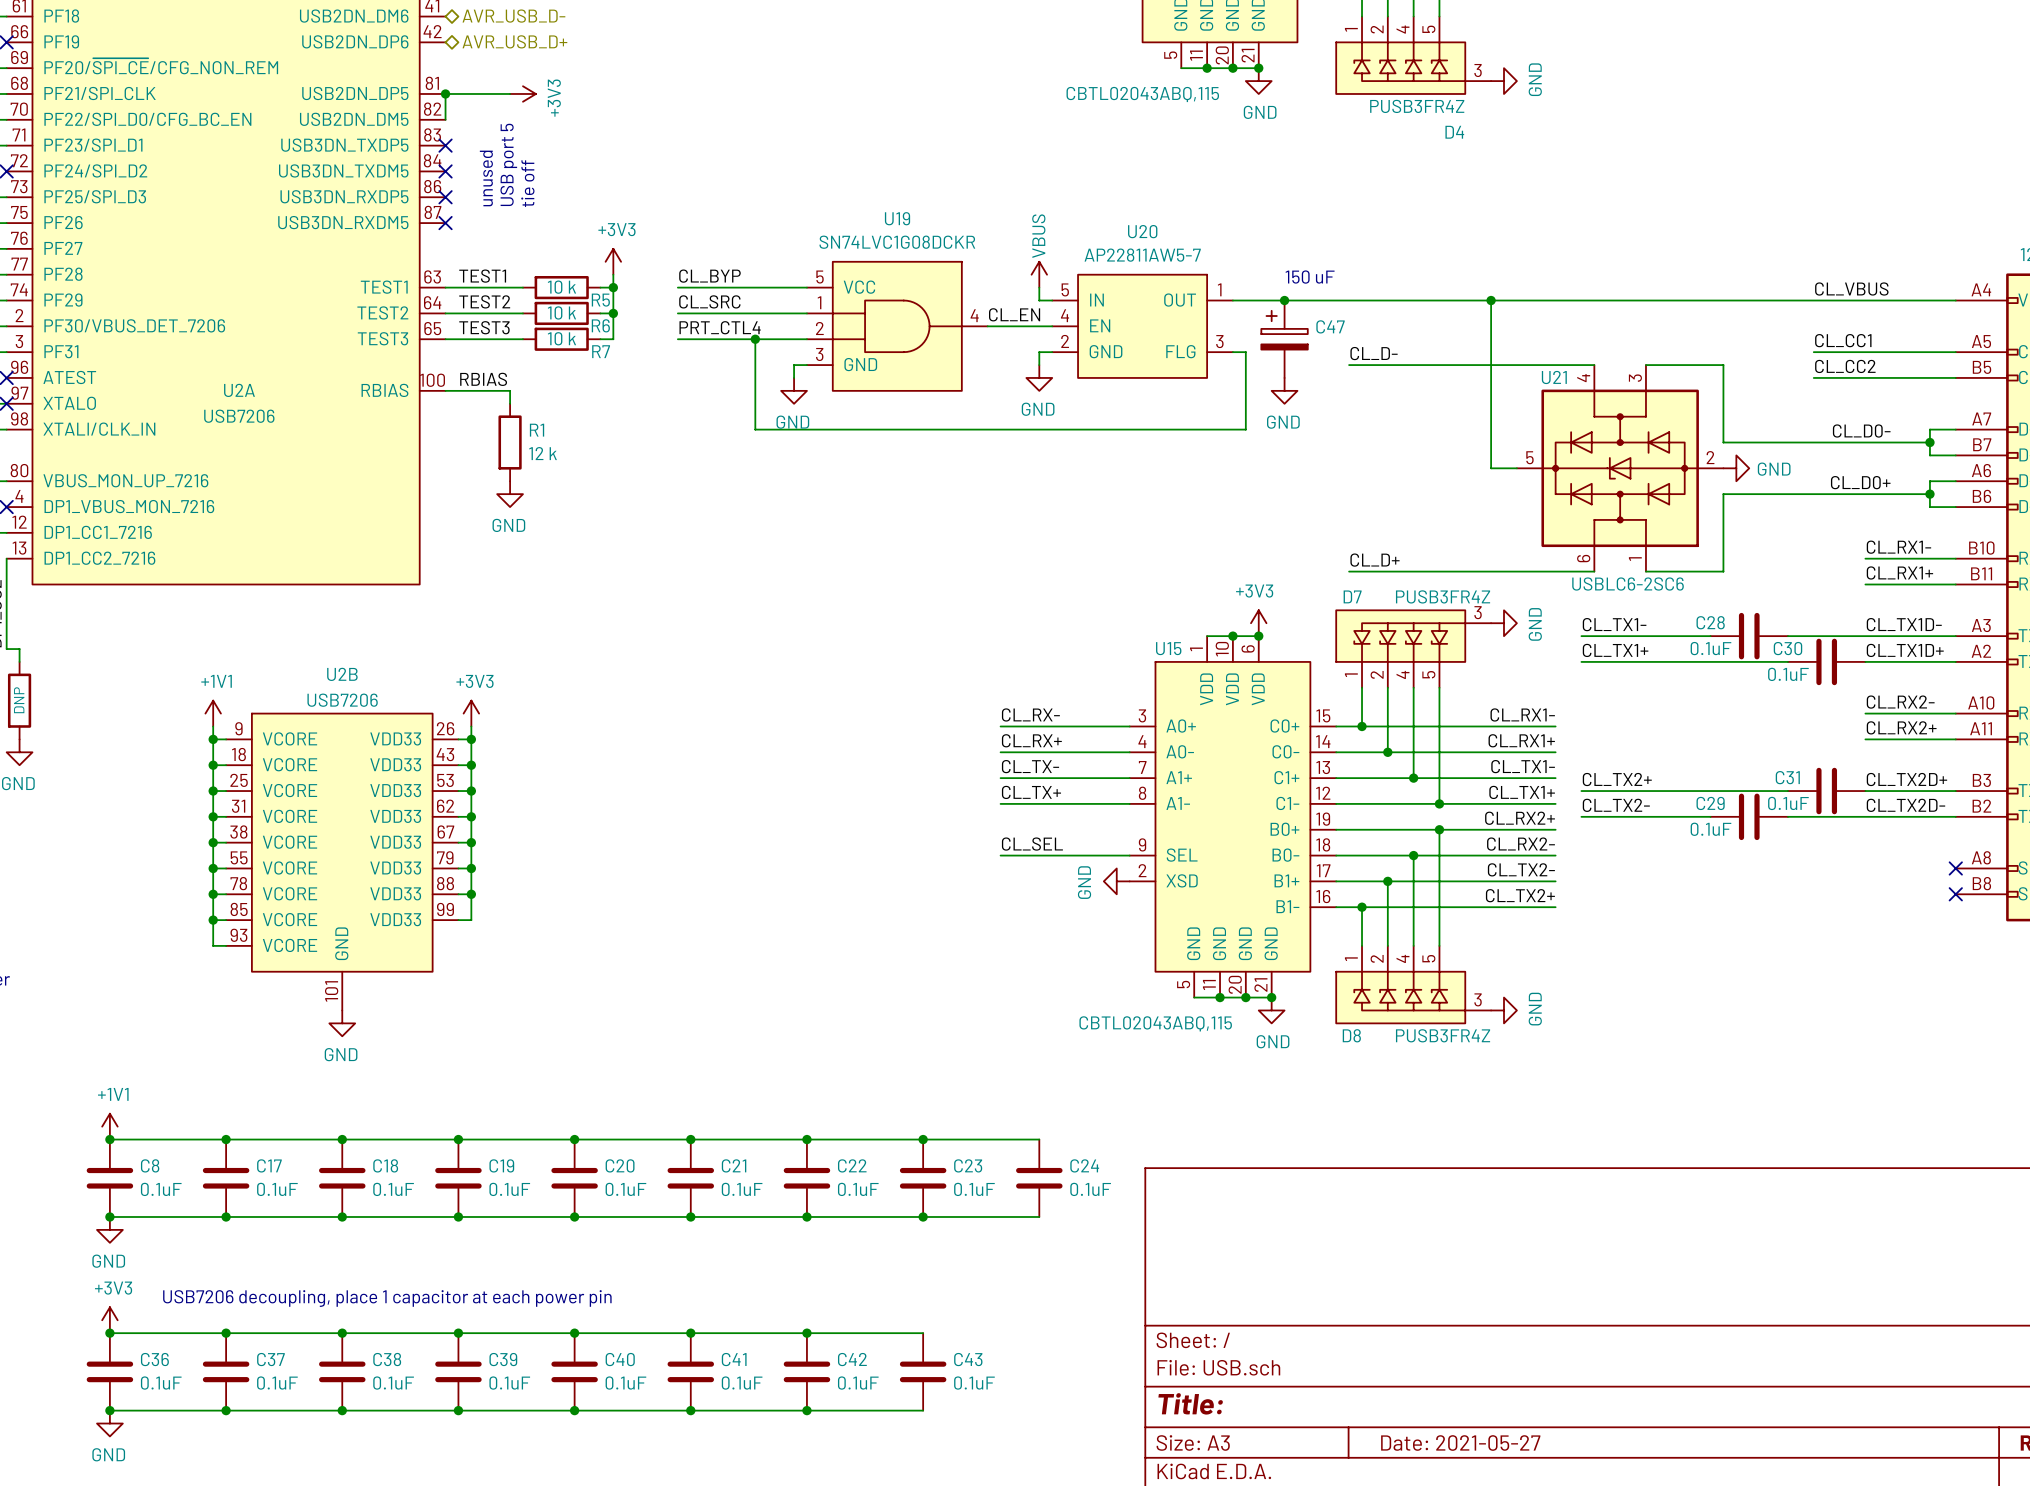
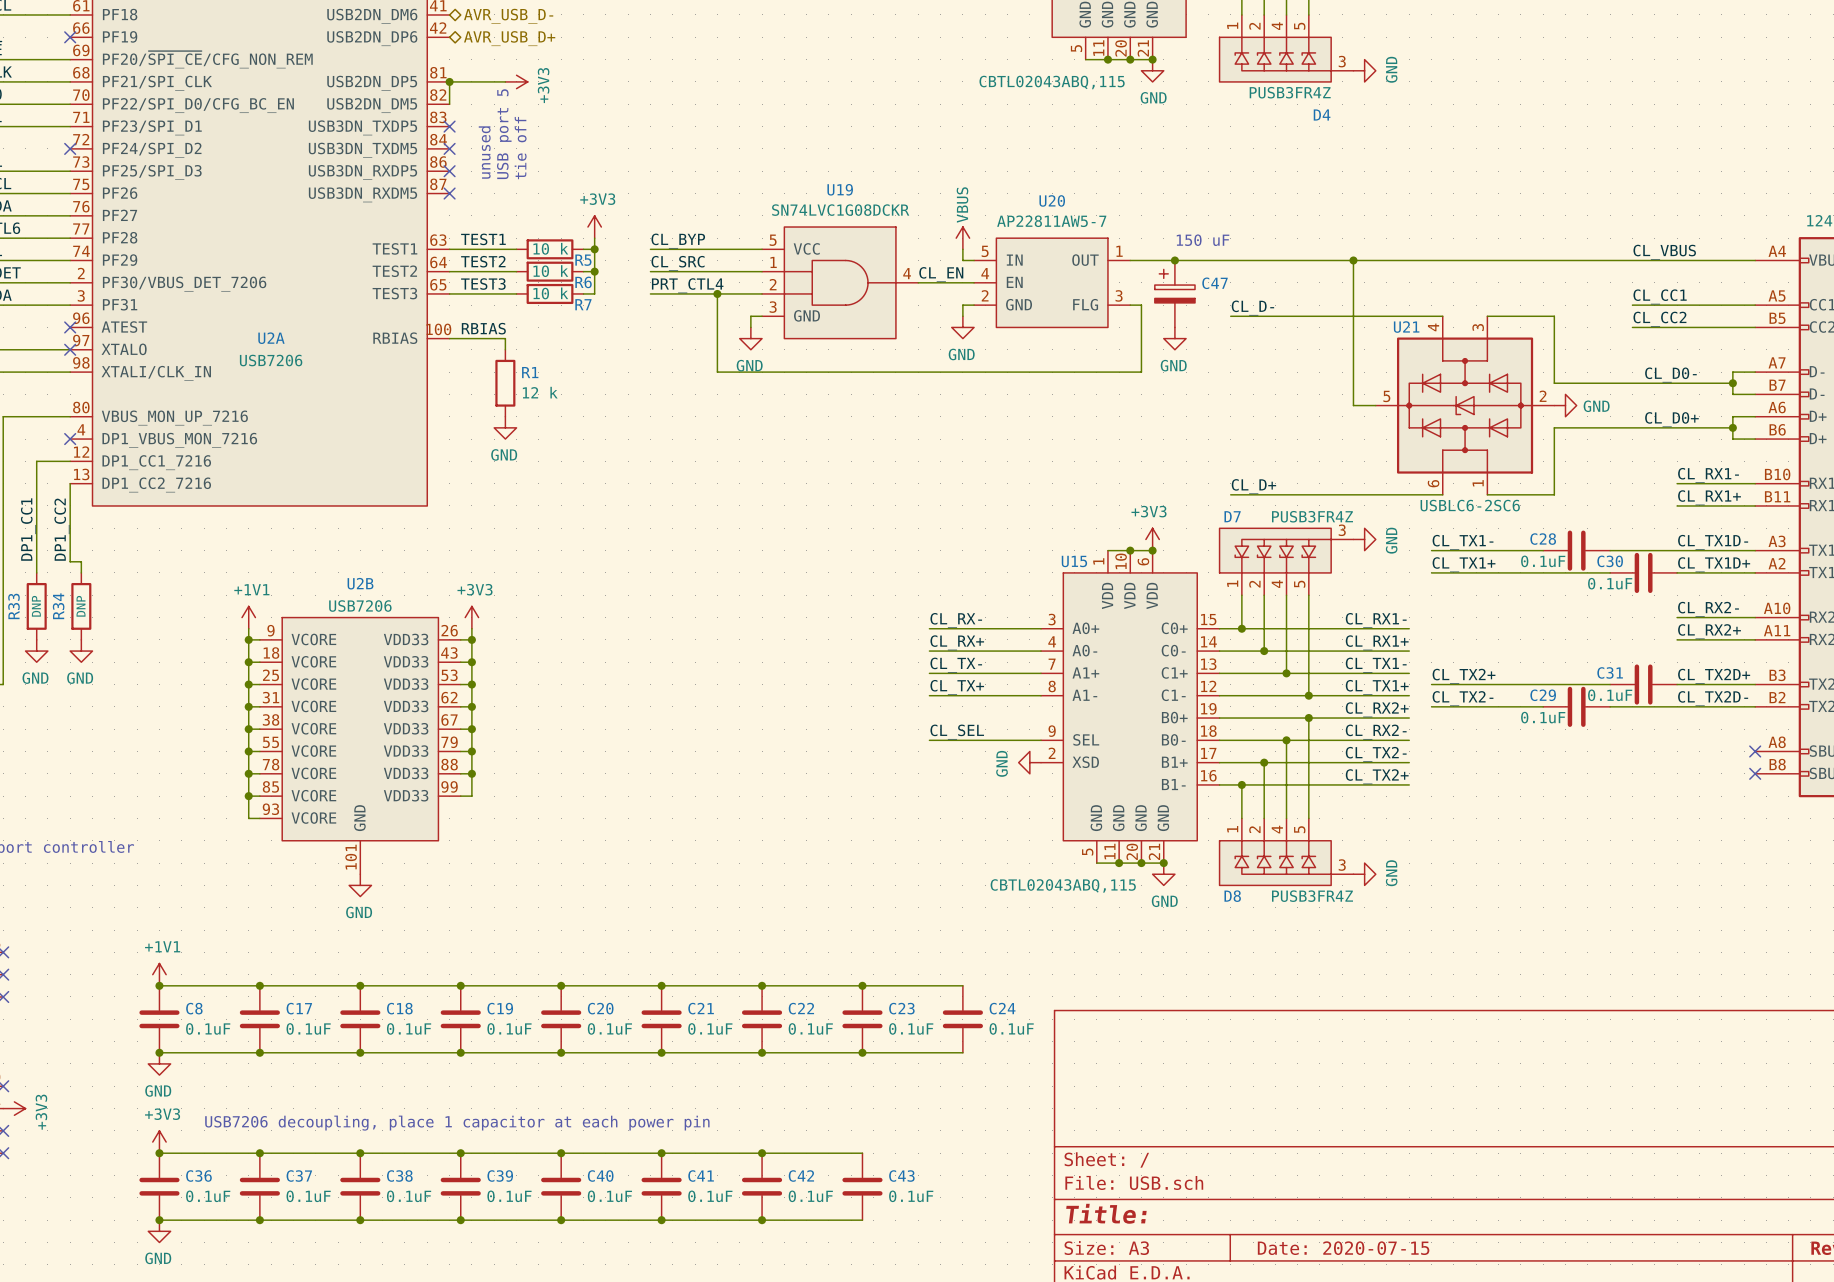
title block: Date: 2021-05-27 (1460, 1443) -> Date: 2020-07-15 (1343, 1248)

